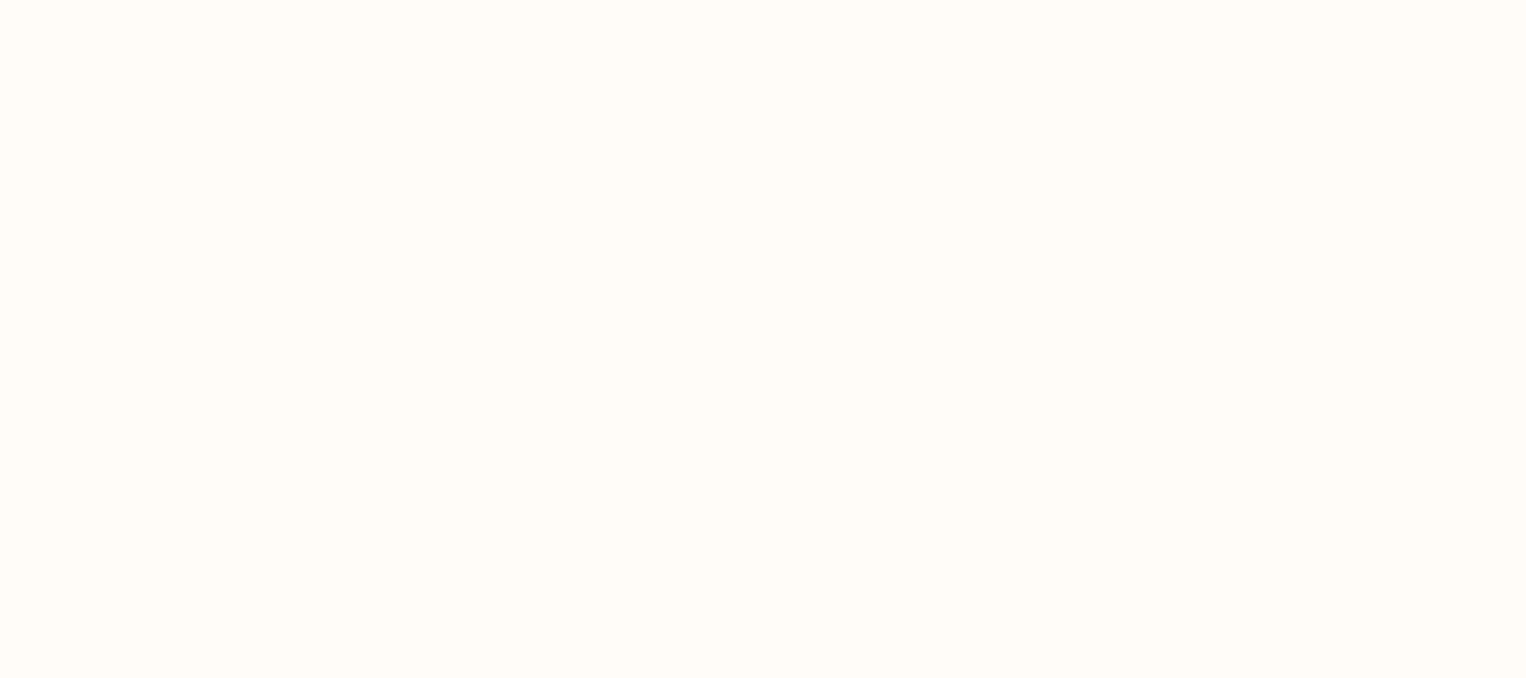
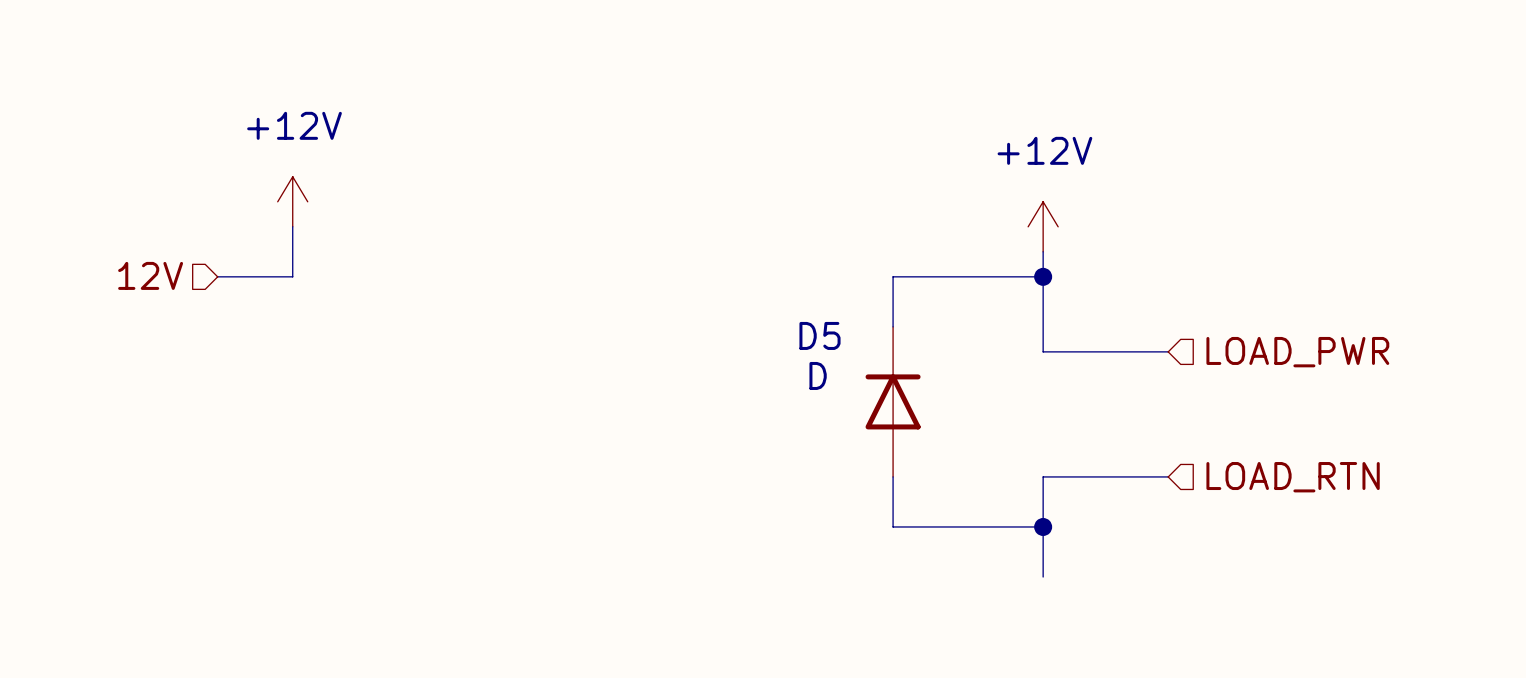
power symbol: none -> +12V (292, 201)
wire: none -> (292, 226) (292, 276) (217, 276)
power symbol: none -> +12V (1043, 226)
wire: none -> (1043, 251) (1043, 351) (1168, 351)
hierarchical label: none -> 12V (150, 275)
wire: none -> (1043, 276) (893, 276) (893, 326)
junction: none -> (1043, 276)
hierarchical label: none -> LOAD_PWR (1297, 352)
D5: none -> D (893, 401)
wire: none -> (893, 476) (893, 526) (1043, 526)
wire: none -> (1168, 476) (1043, 476) (1043, 577)
hierarchical label: none -> LOAD_RTN (1293, 477)
junction: none -> (1043, 526)

